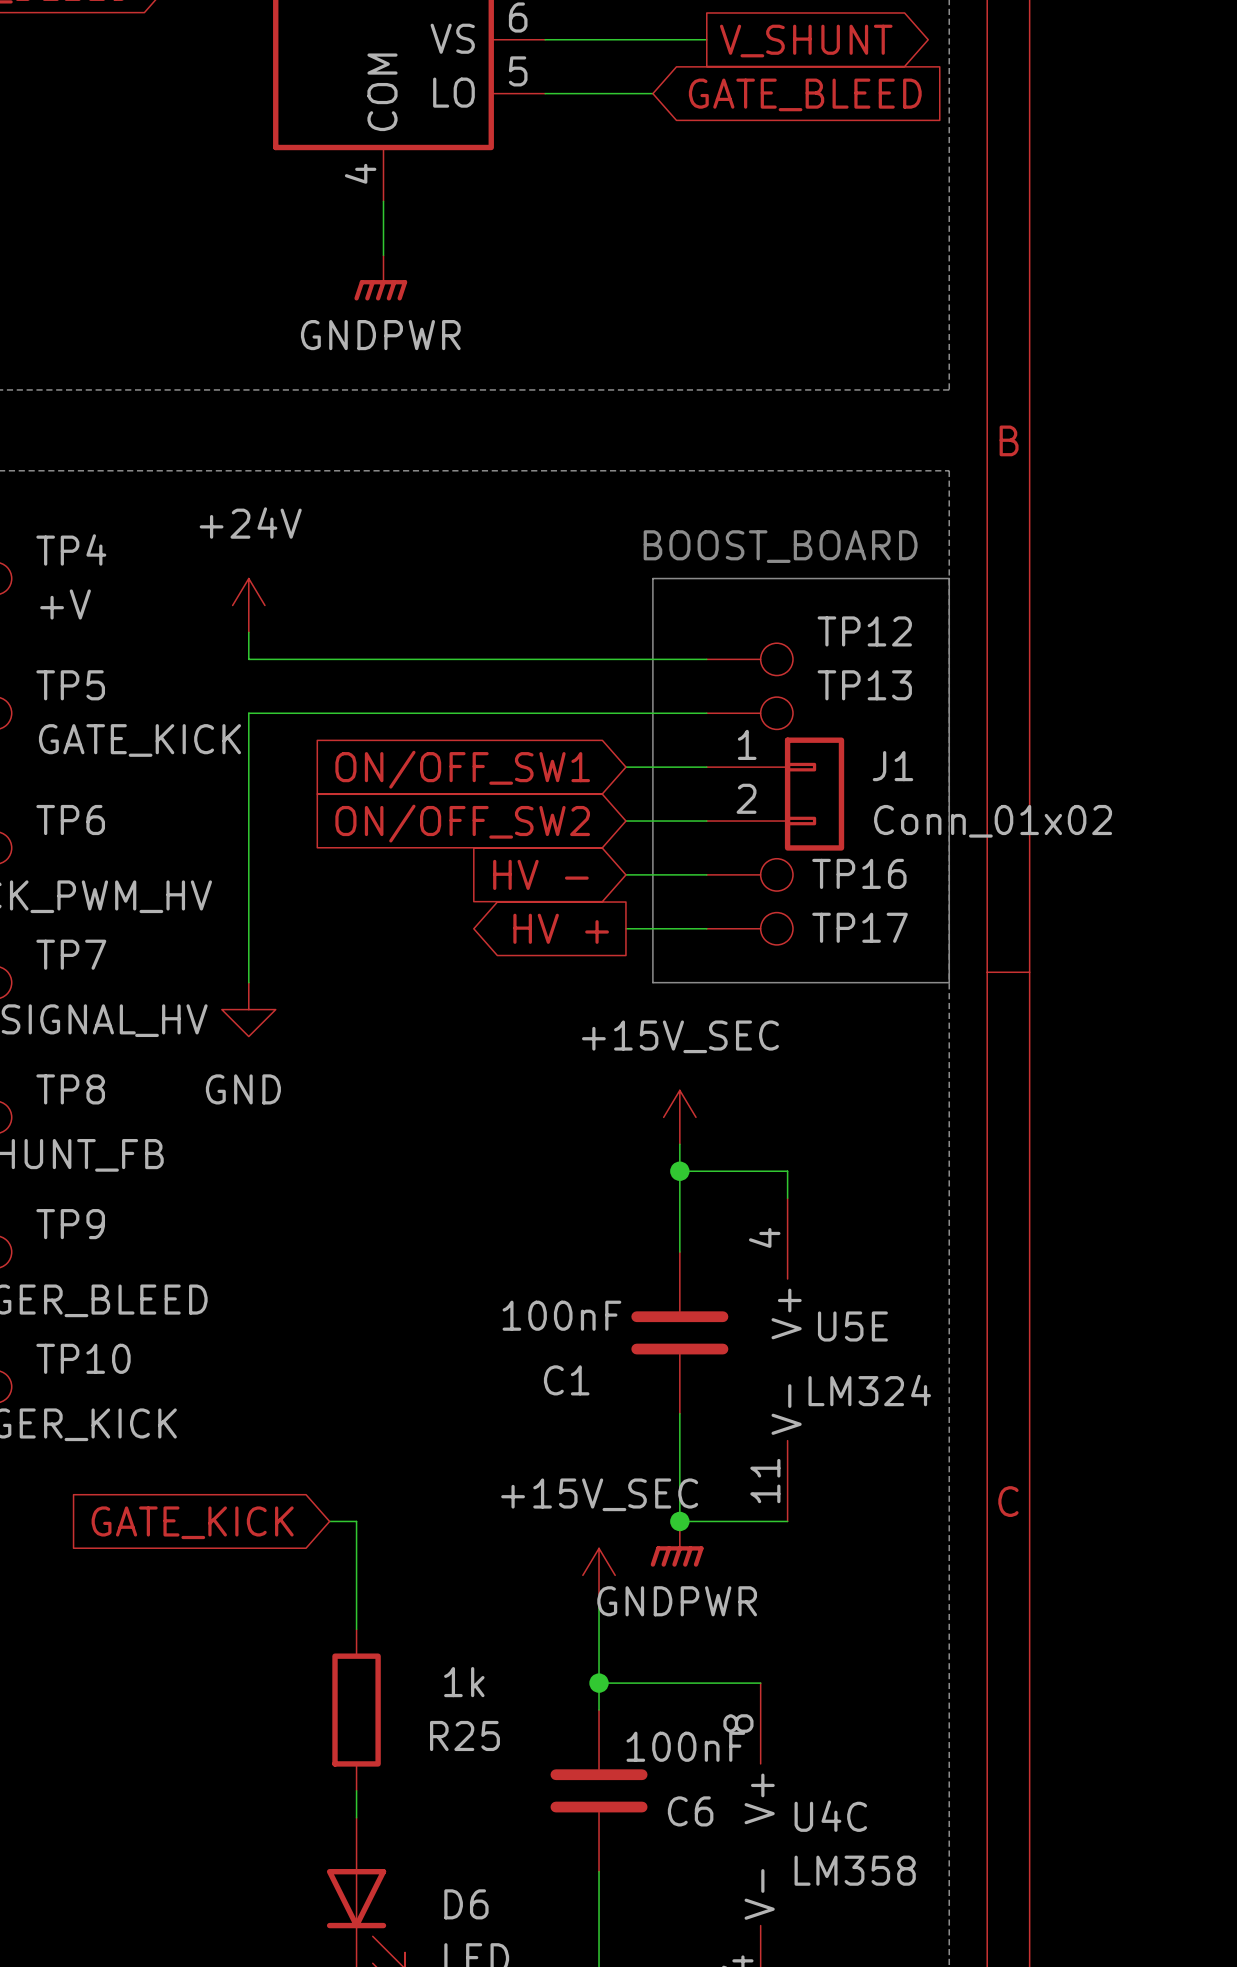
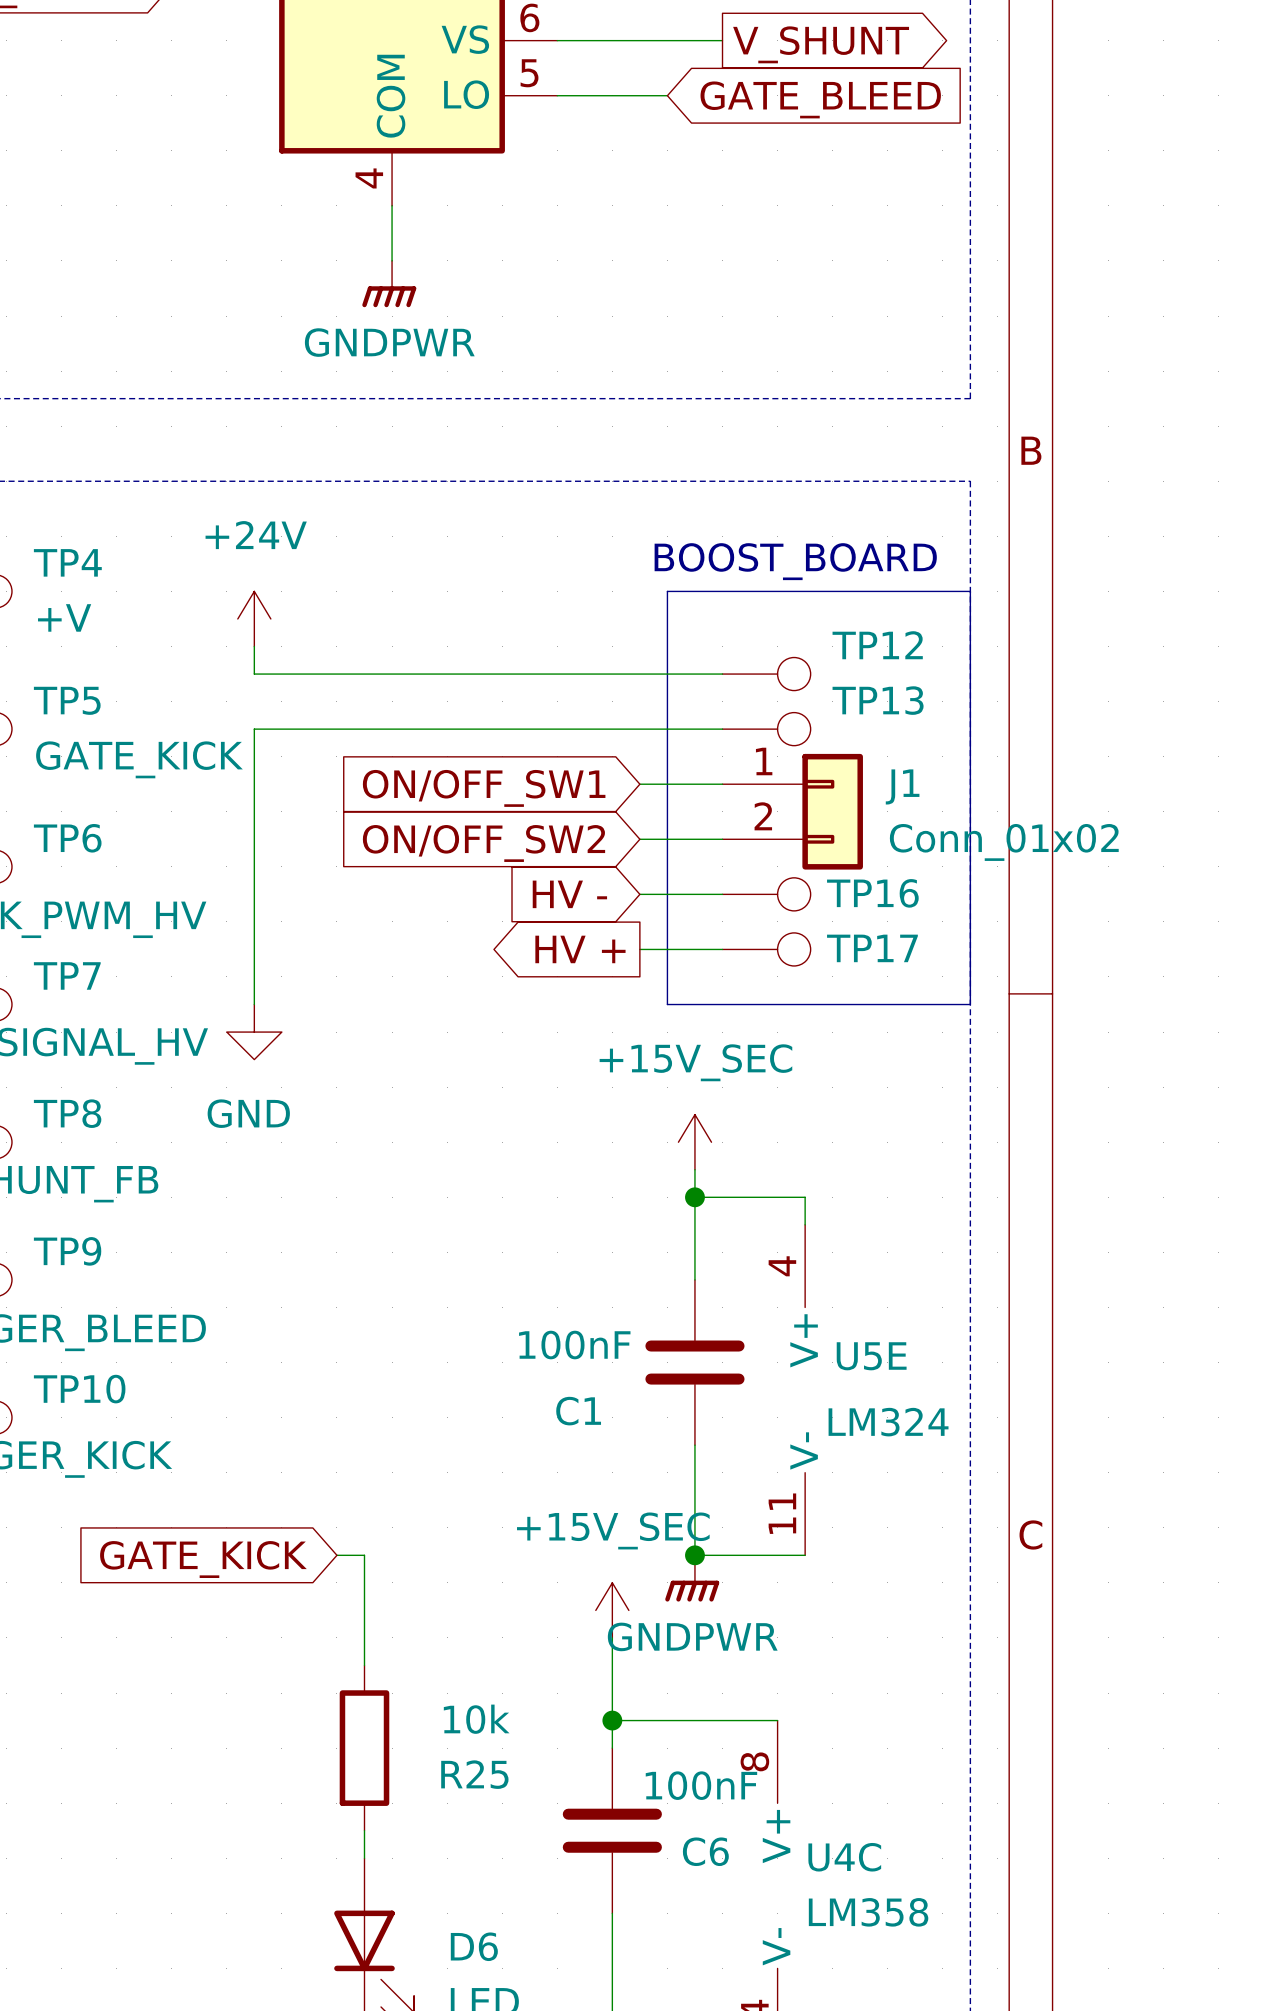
R25 value: 1k (464, 1682) -> 10k (476, 1719)

